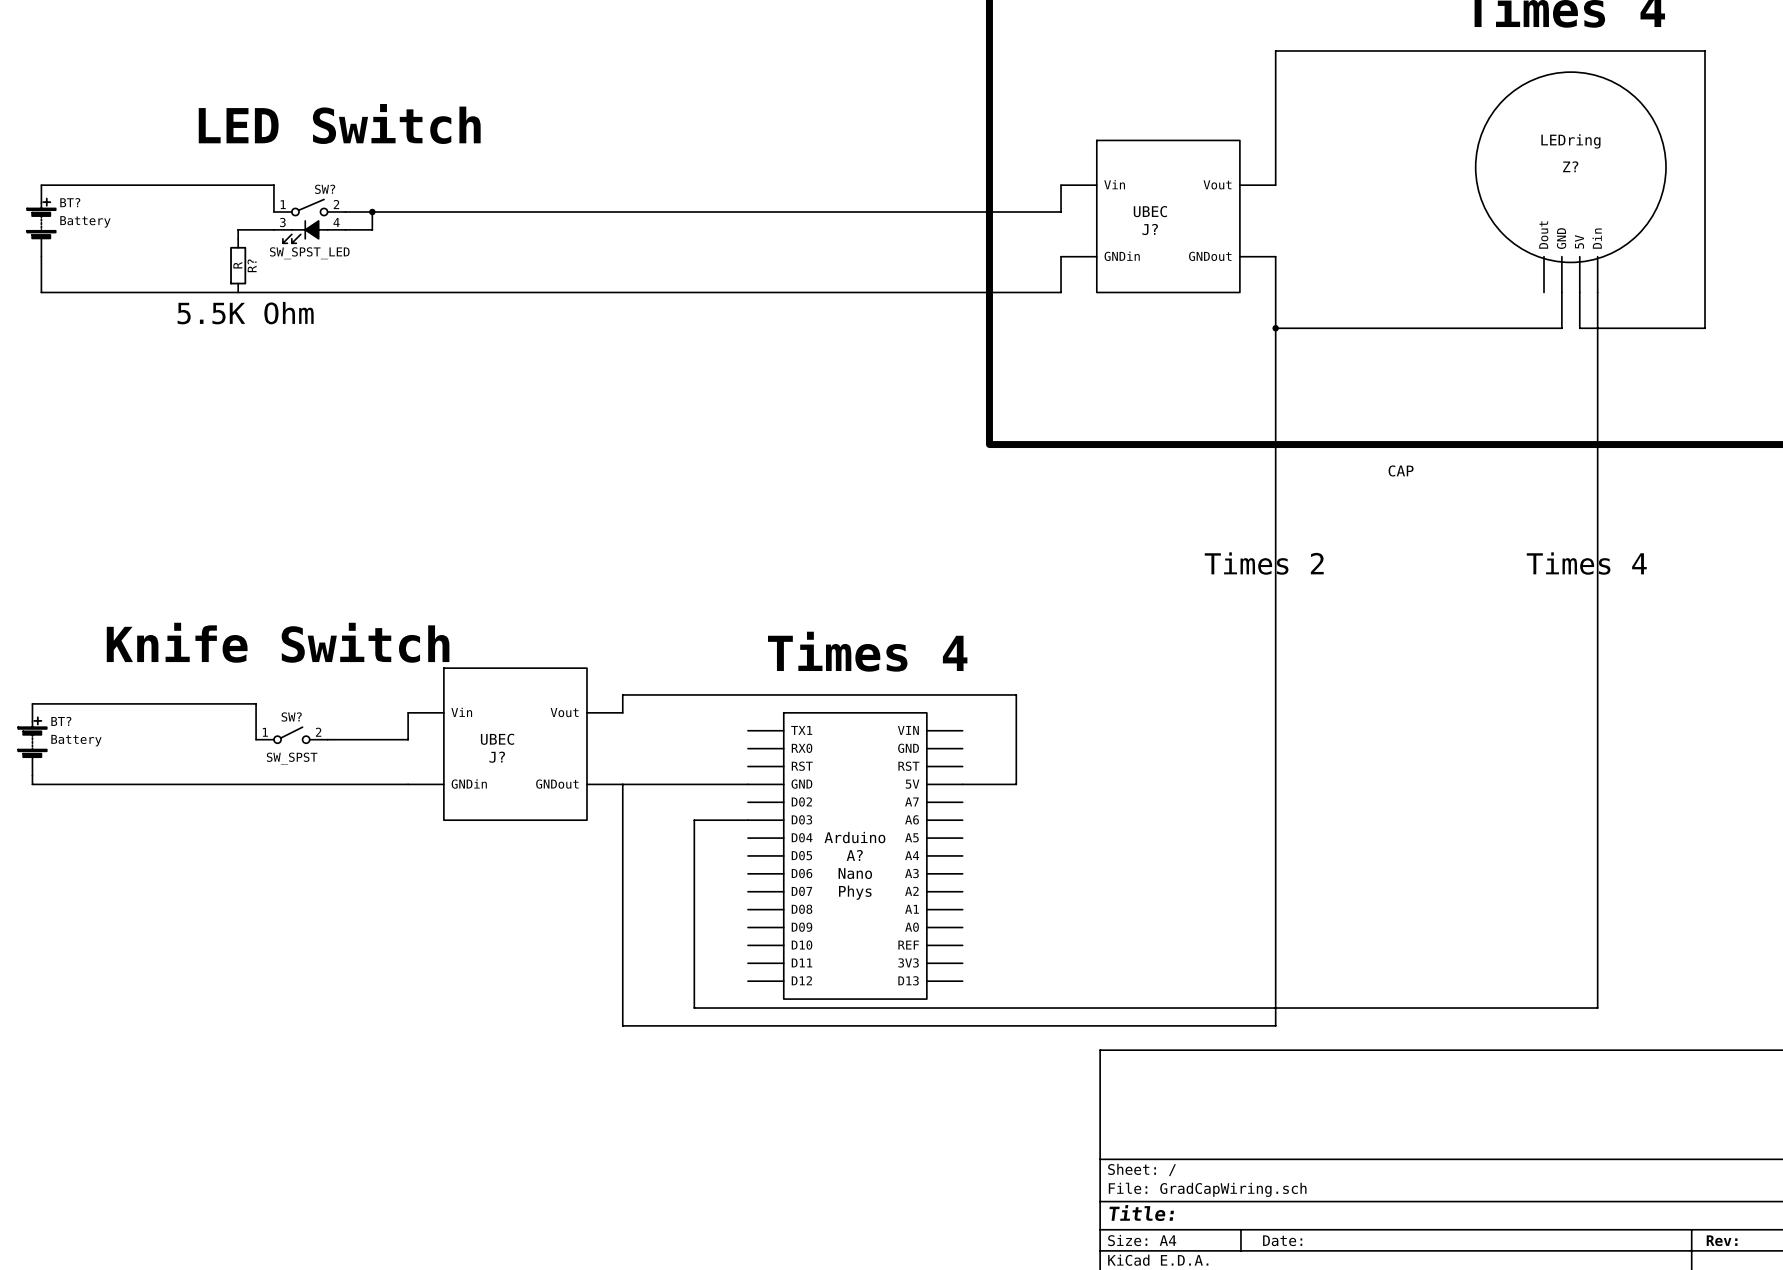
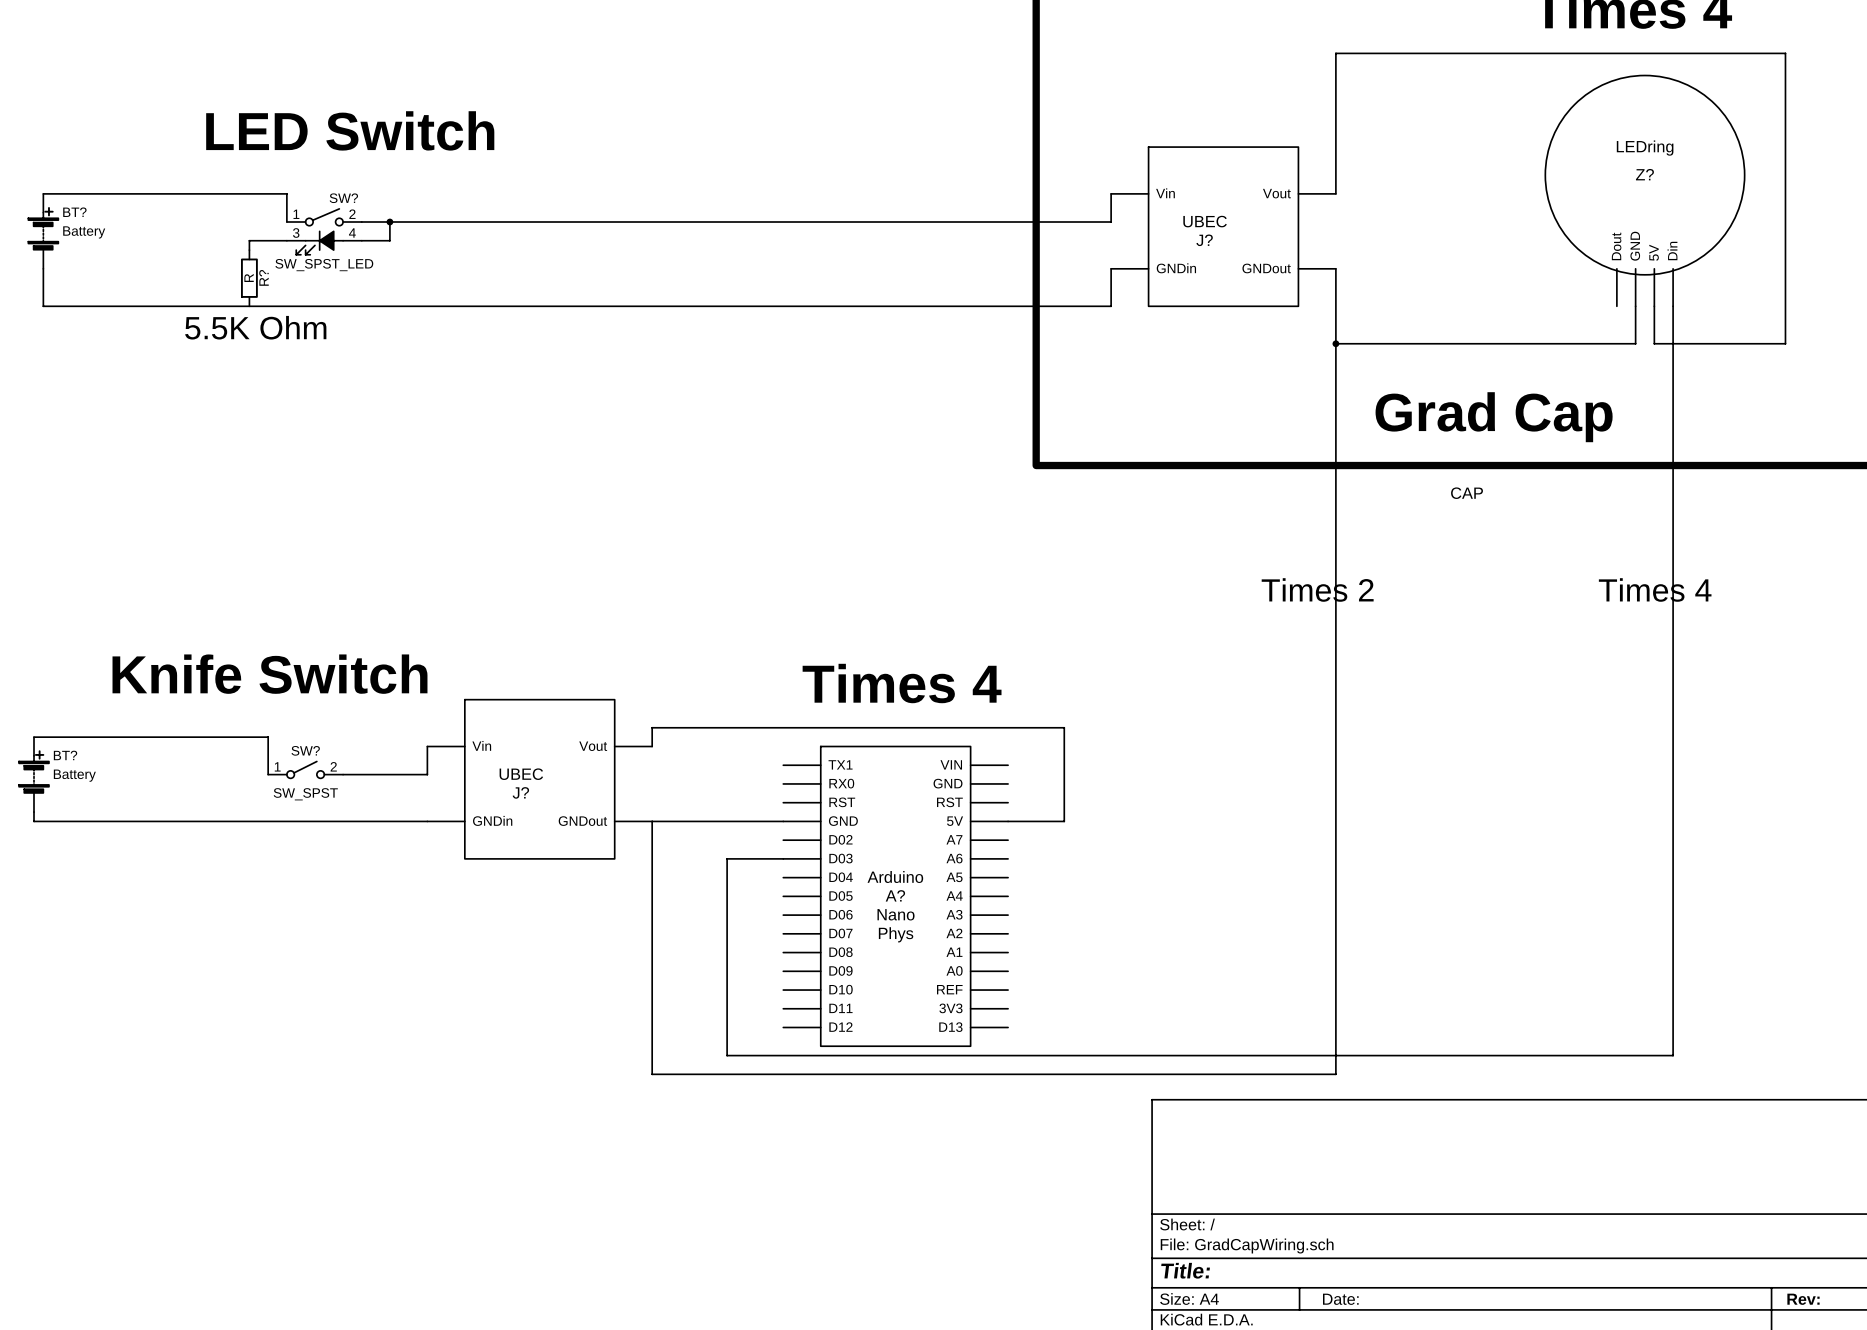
text: none -> Grad Cap (1494, 417)

